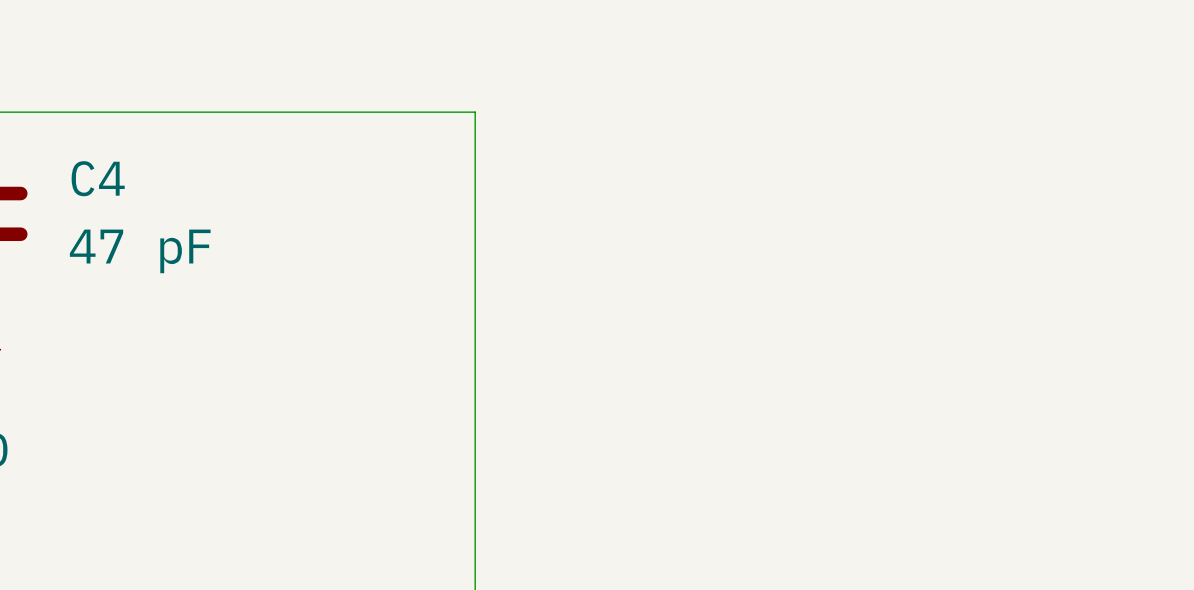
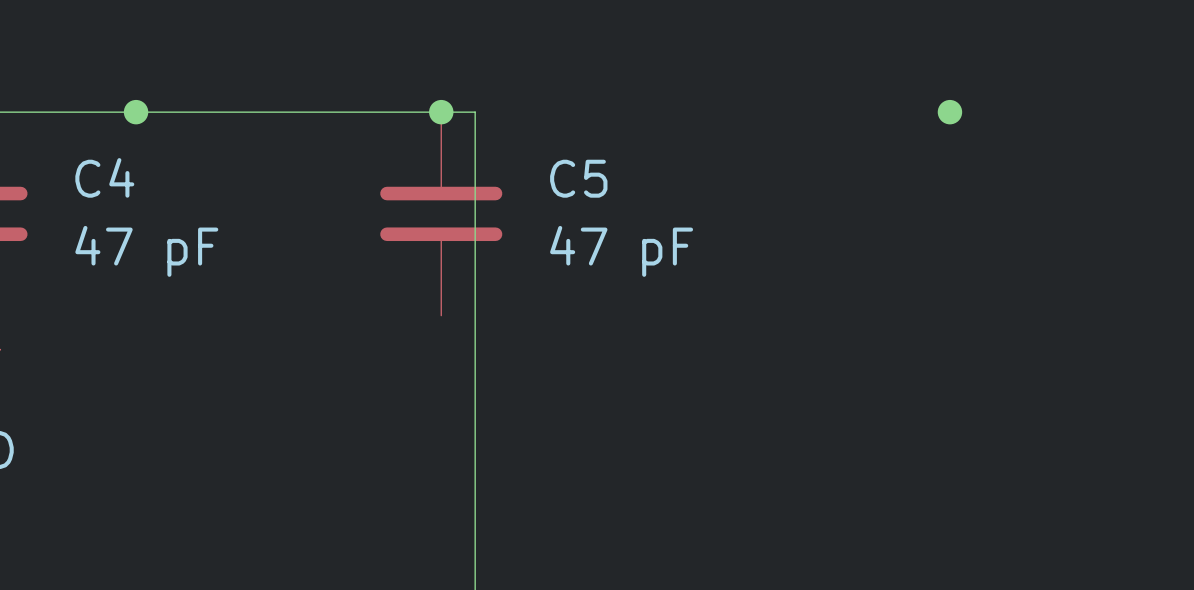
junction: none -> (136, 112)
junction: none -> (441, 112)
junction: none -> (949, 112)
C5: none -> 47 pF (441, 213)

